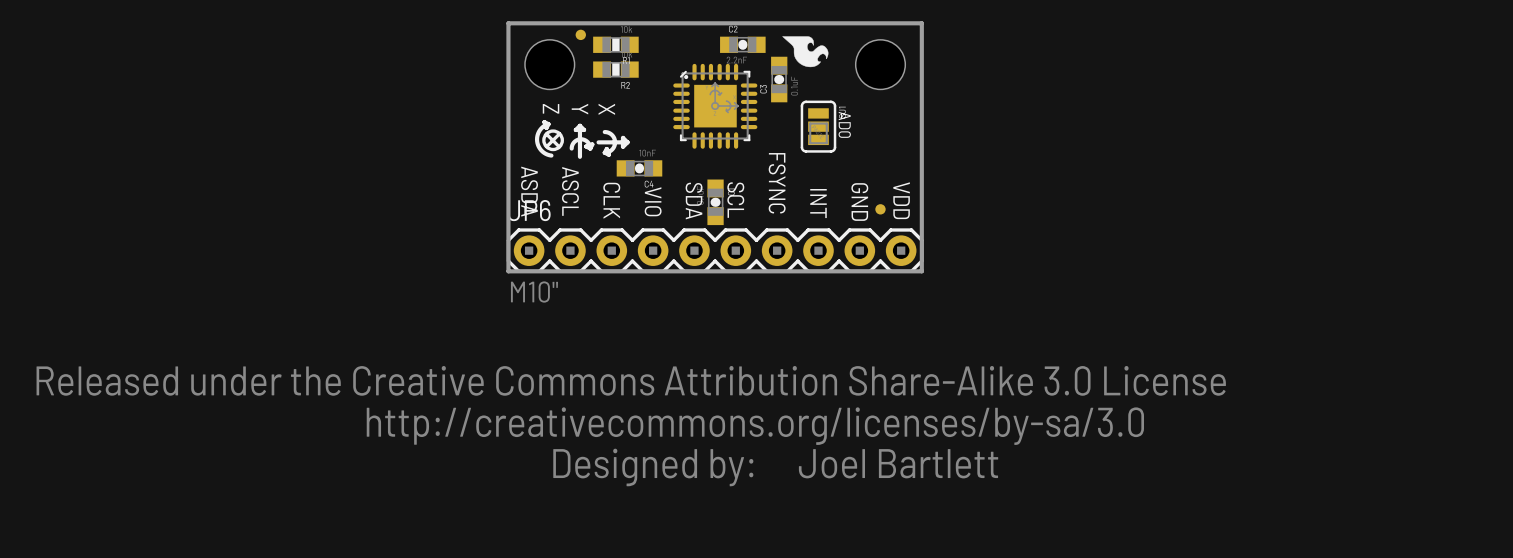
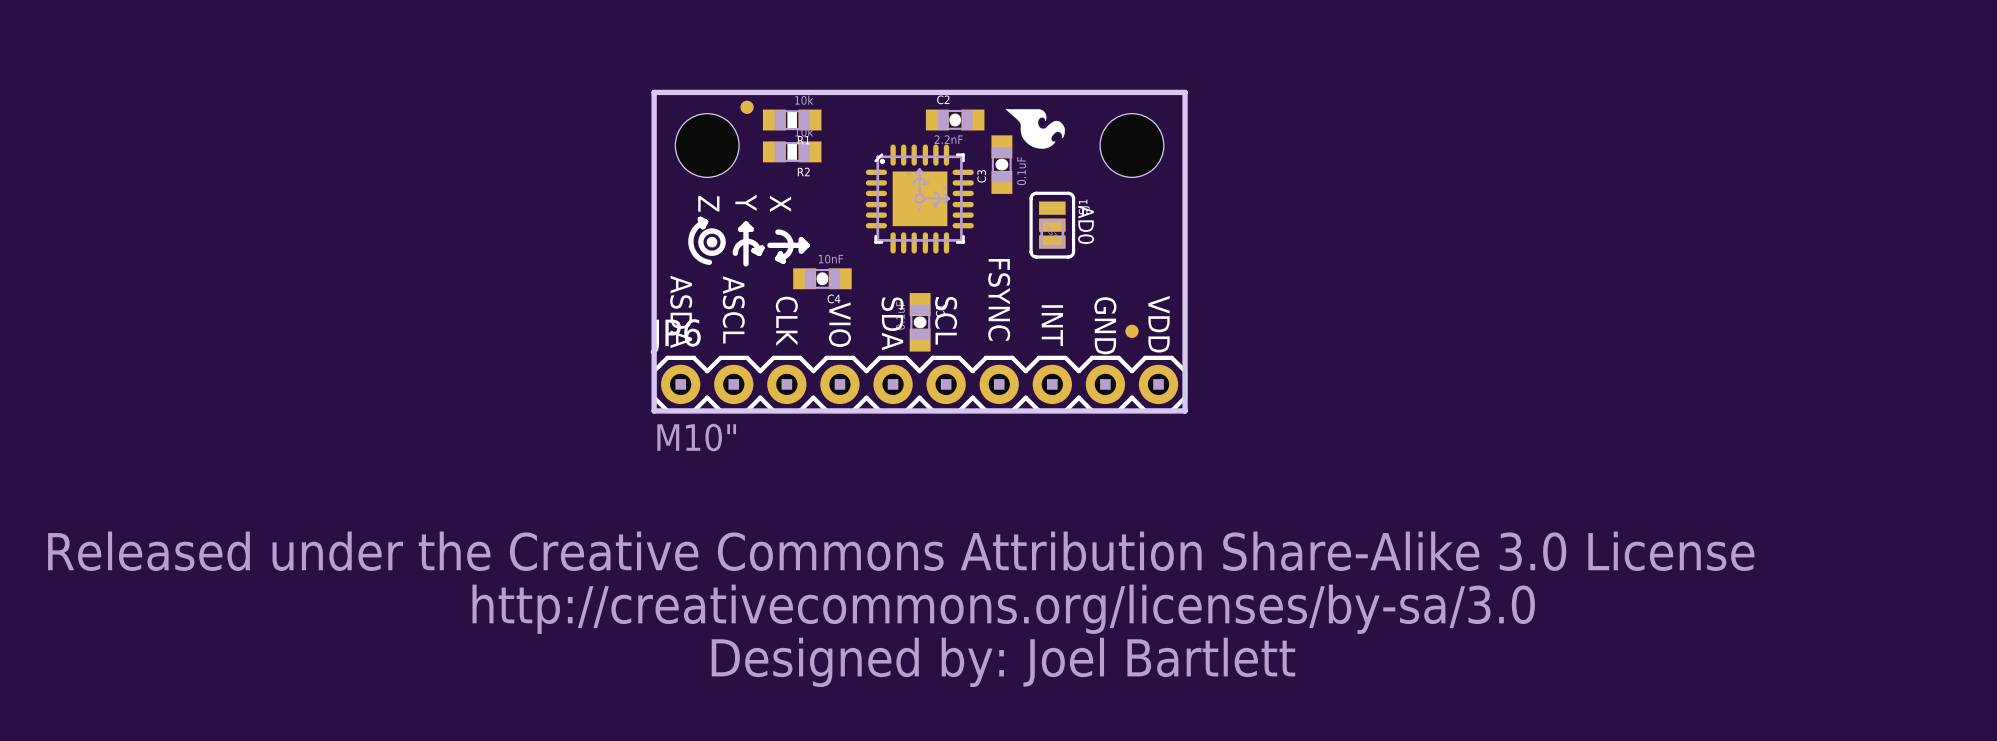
drawing: [542, 129, 564, 152] -> none
drawing: none -> [698, 228, 726, 256]
line: (559, 133) (546, 146) -> none
line: (546, 134) (559, 146) -> none

